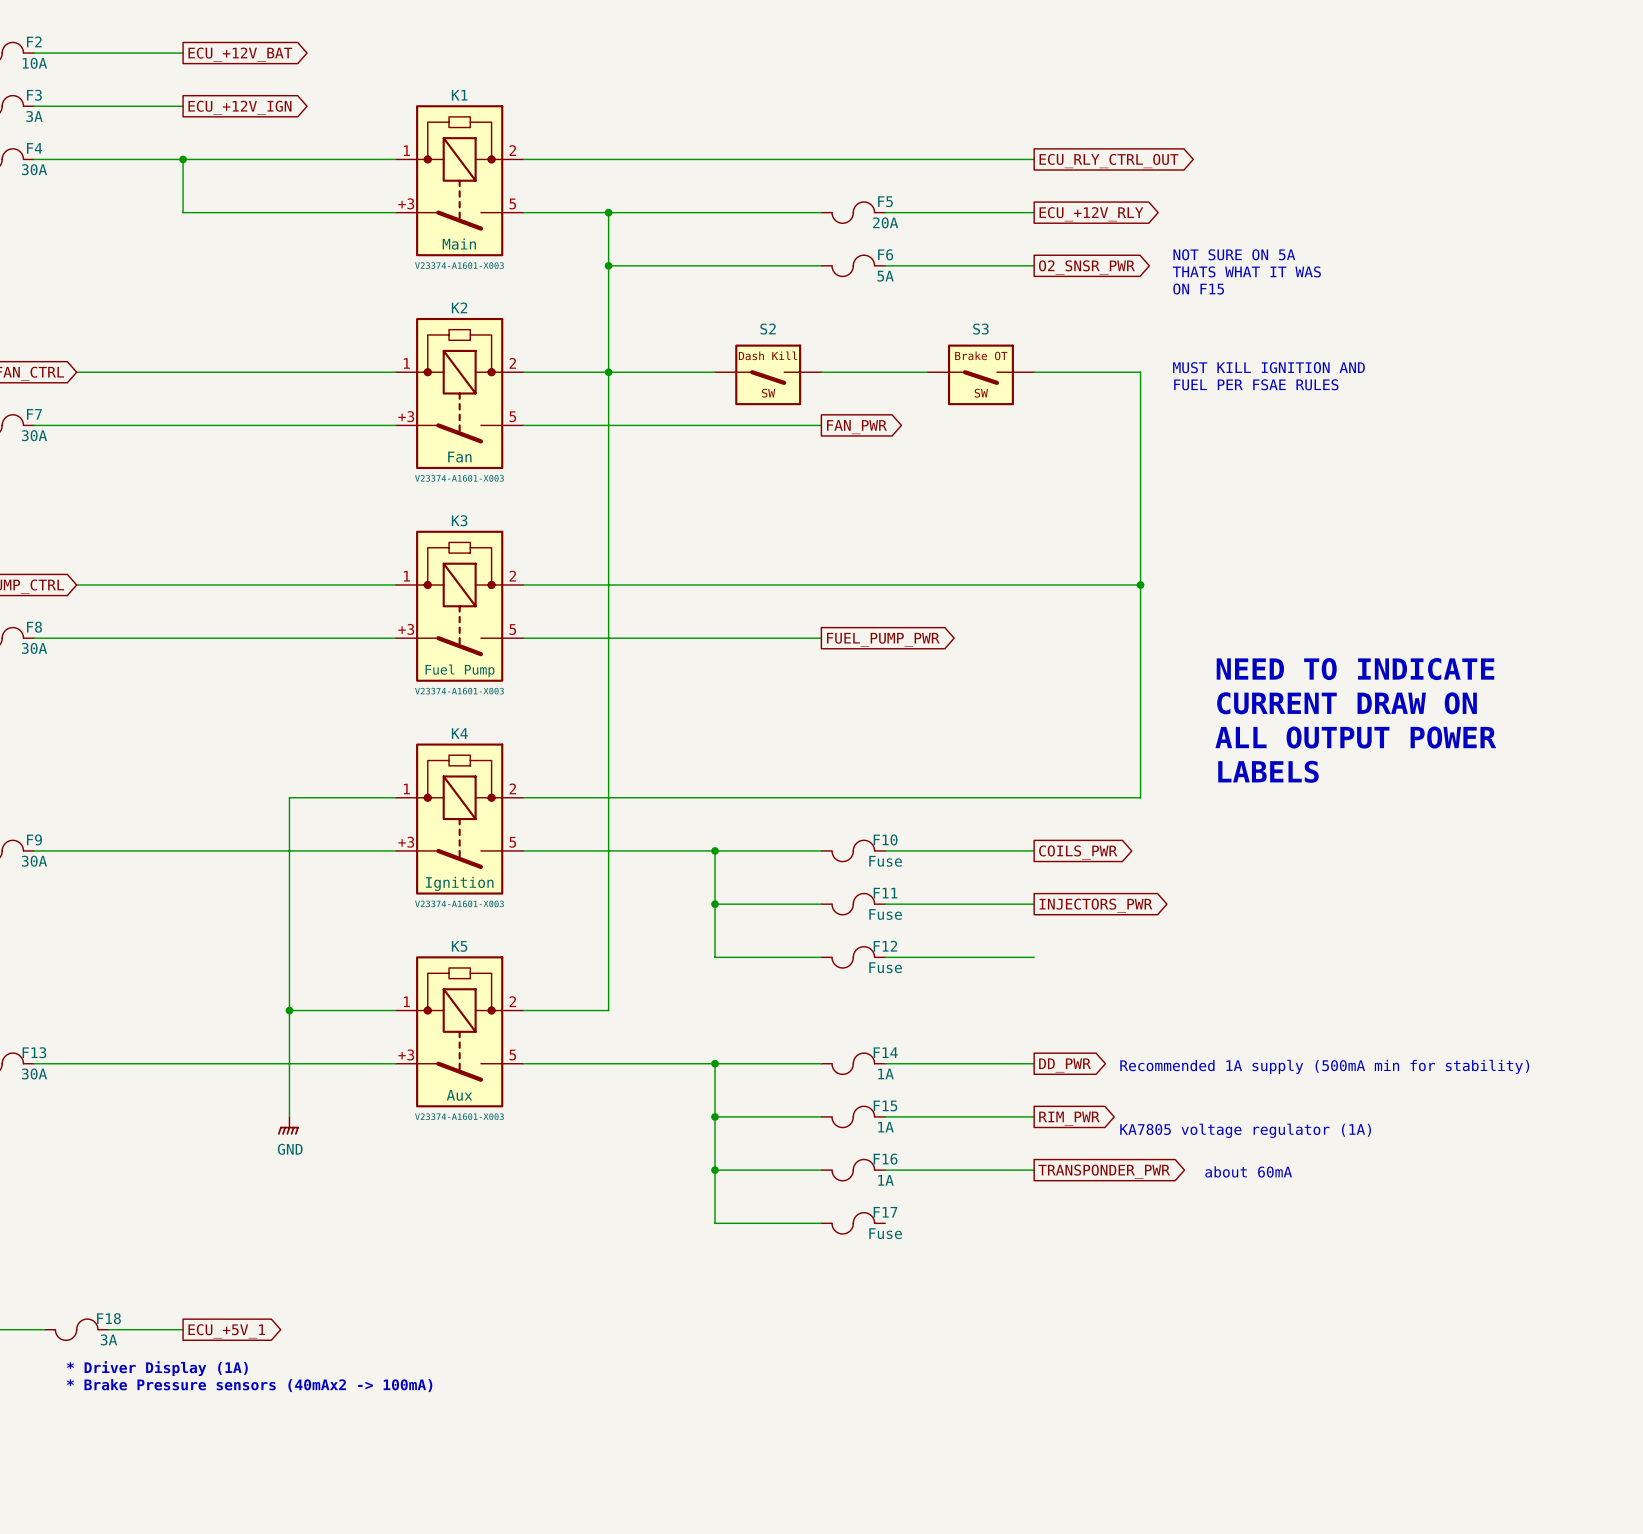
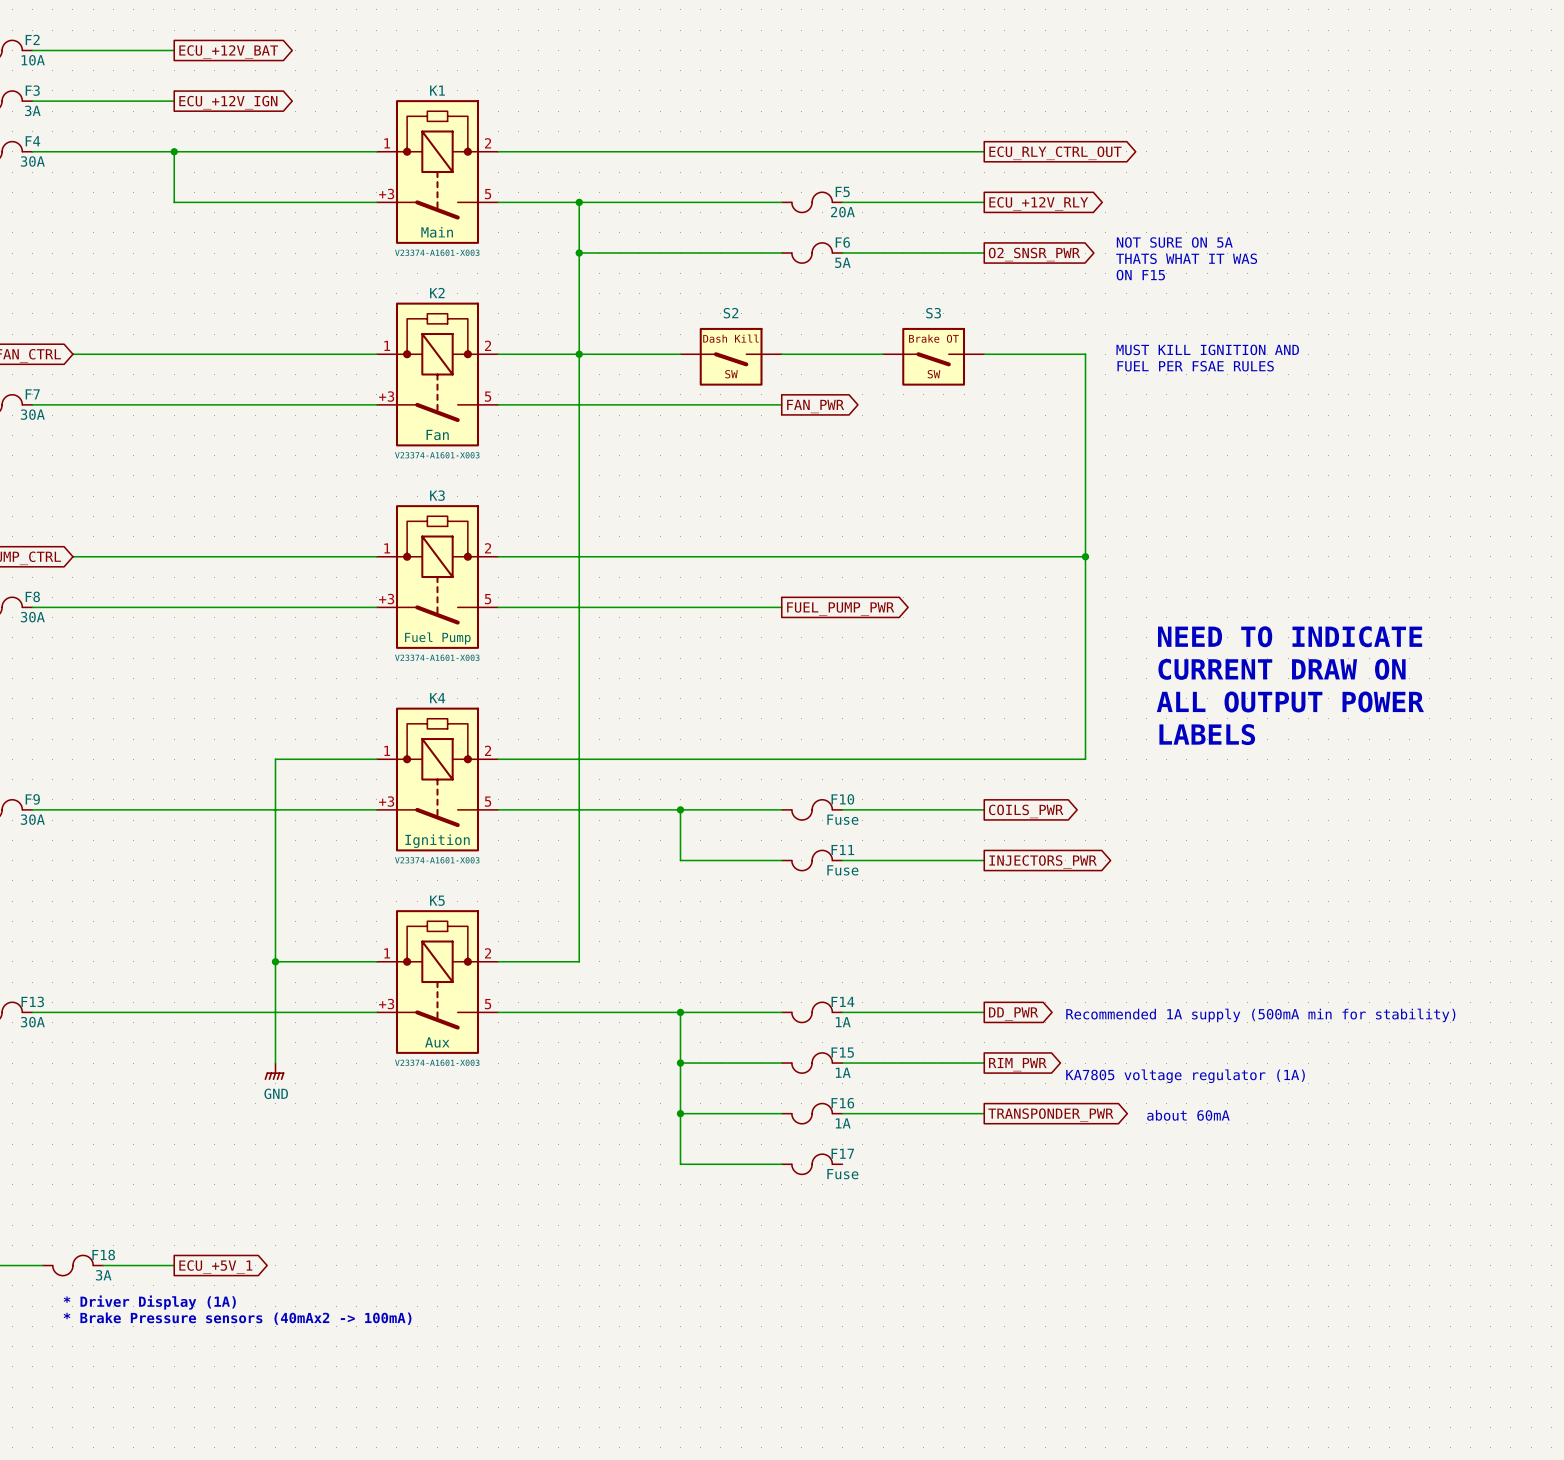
wire: (715, 904) (715, 957) (821, 957) -> none
junction: (715, 904) -> none
F12: Fuse (853, 957) -> none
wire: (885, 957) (1034, 957) -> none

